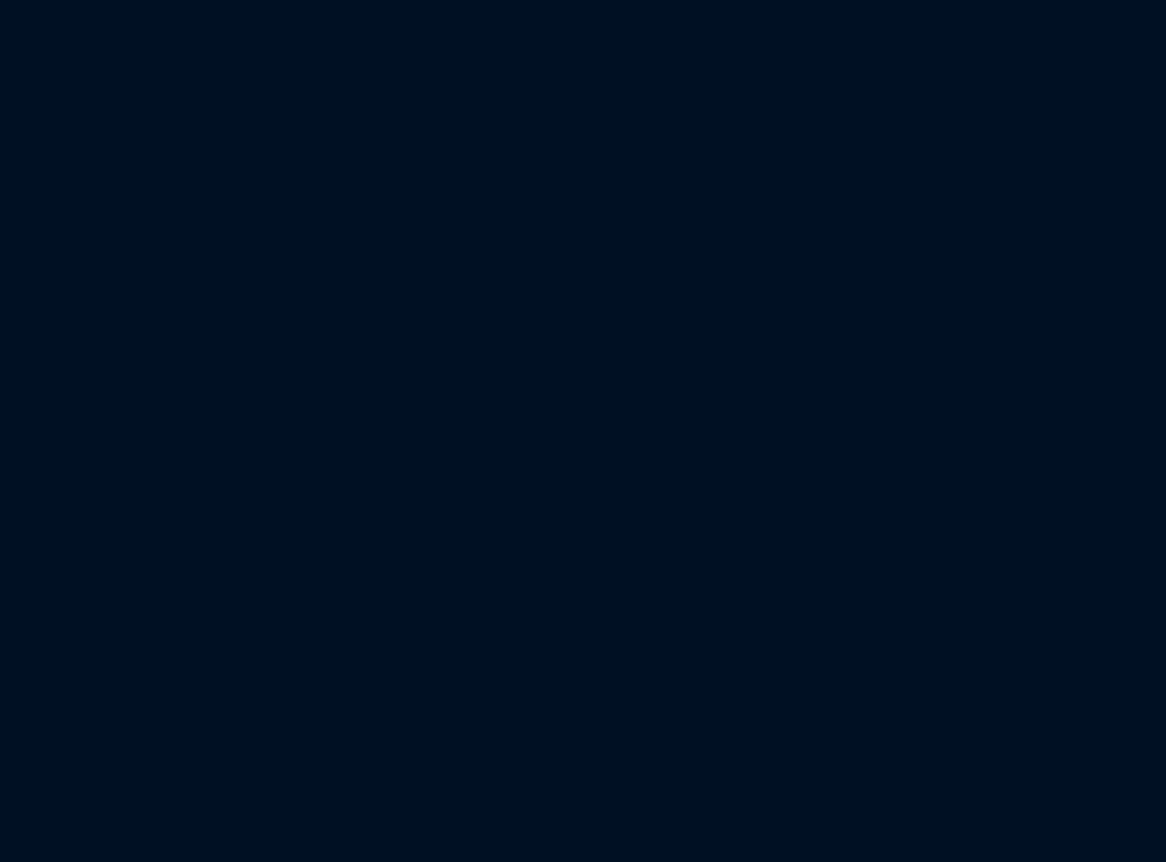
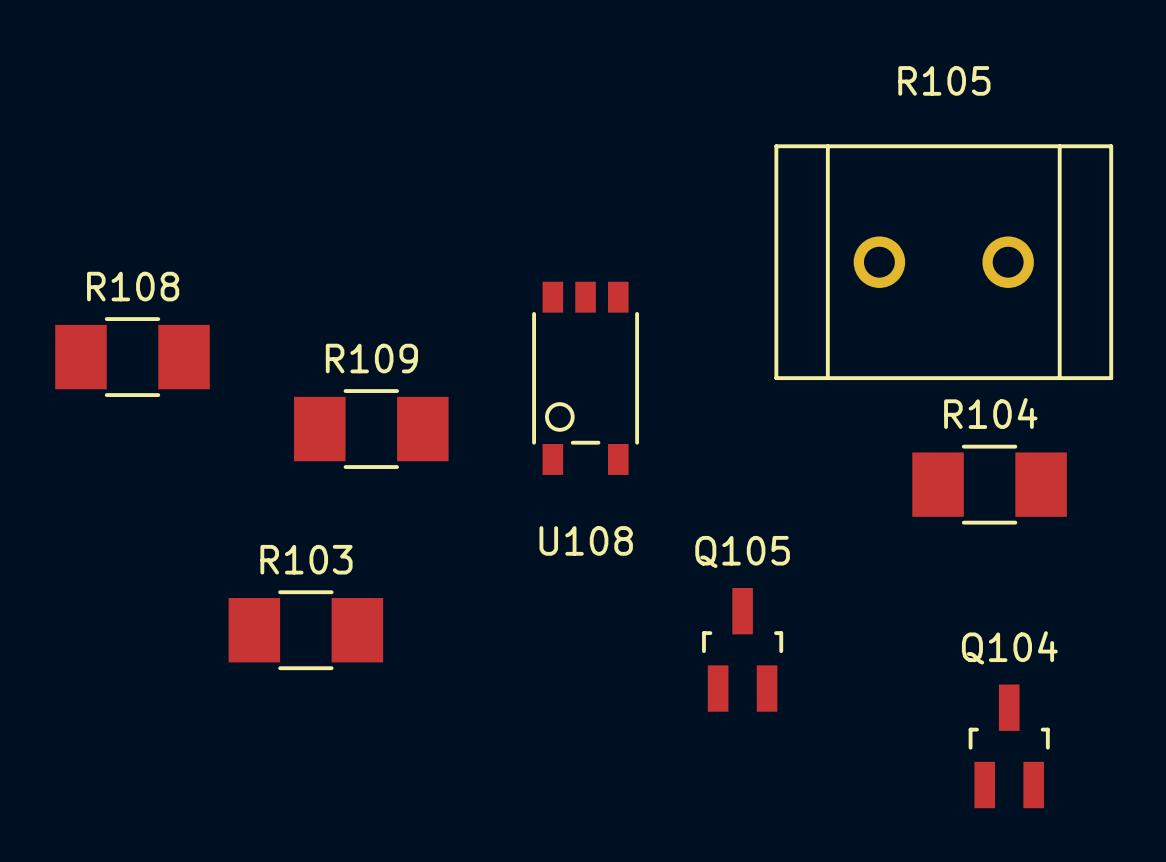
R105: none -> (943, 262)
R108: none -> (132, 357)
U108: none -> (585, 378)
R109: none -> (371, 429)
R104: none -> (989, 484)
R103: none -> (305, 630)
Q105: none -> (742, 649)
Q104: none -> (1009, 746)

